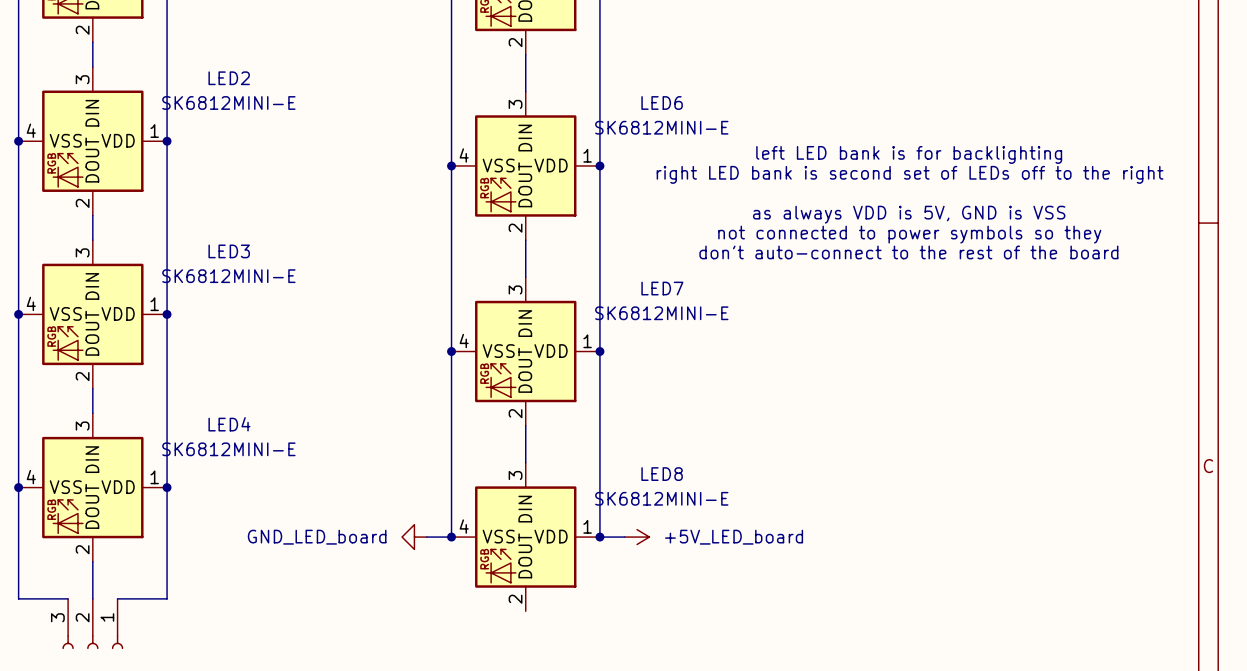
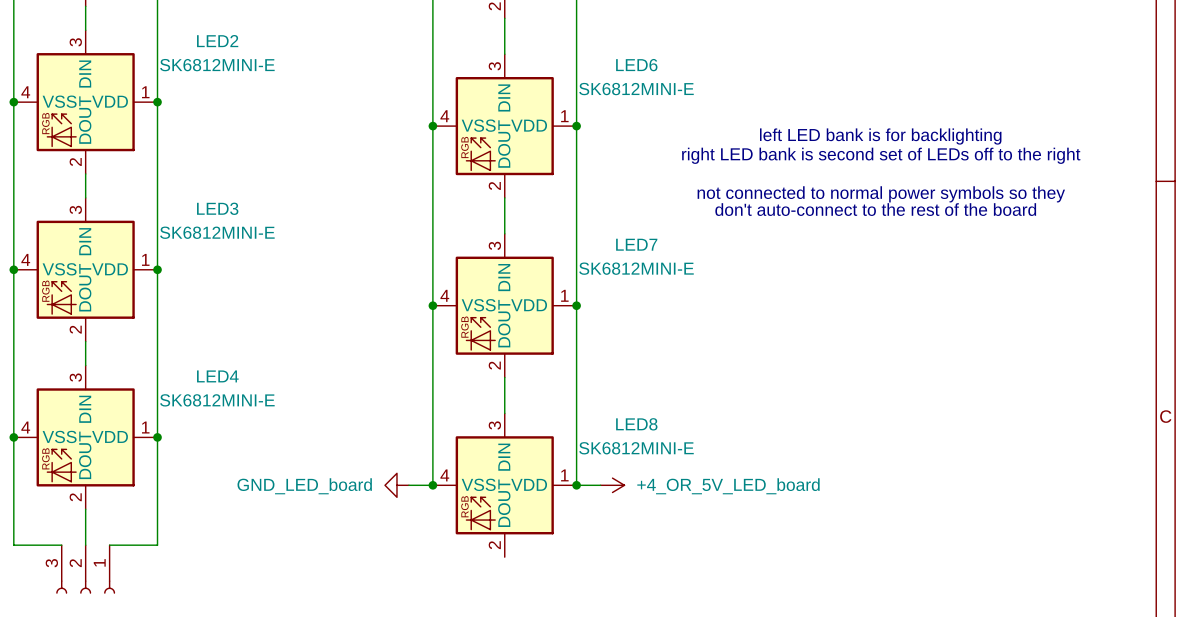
text: left LED bank is for backlighting (909, 154) -> none
text: right LED bank is second set of LEDs off to the right (910, 174) -> left LED bank is for backlighting (880, 136)
text: none -> right LED bank is second set of LEDs off to the right (881, 155)
text: as always VDD is 5V, GND is VSS (909, 214) -> none
text: not connected to power symbols so they (909, 234) -> not connected to normal power symbols so they (881, 194)
power symbol: +5V_LED_board (637, 537) -> +4_OR_5V_LED_board (612, 485)

